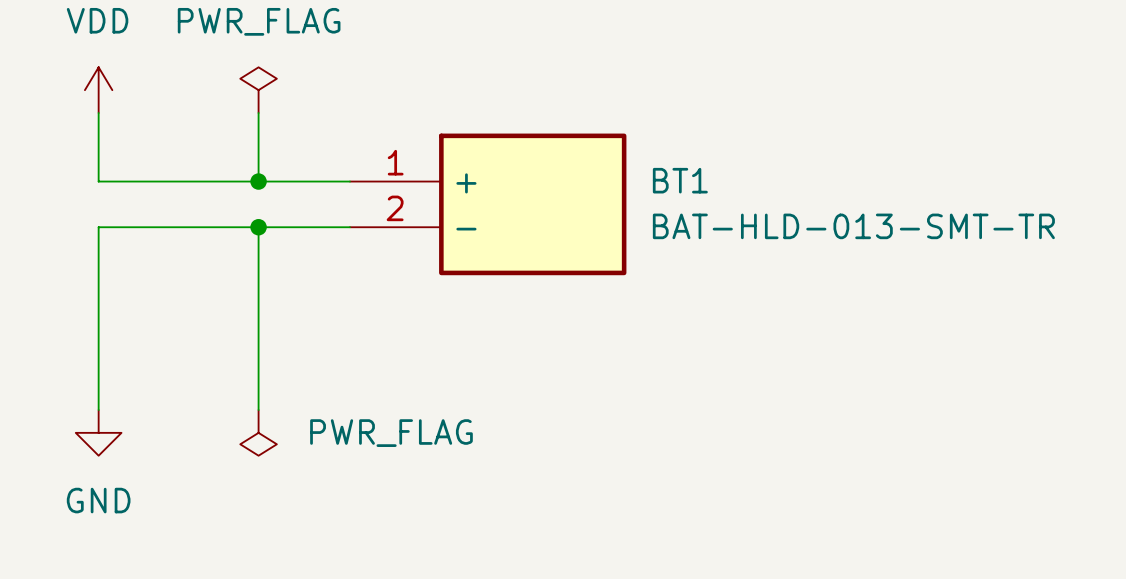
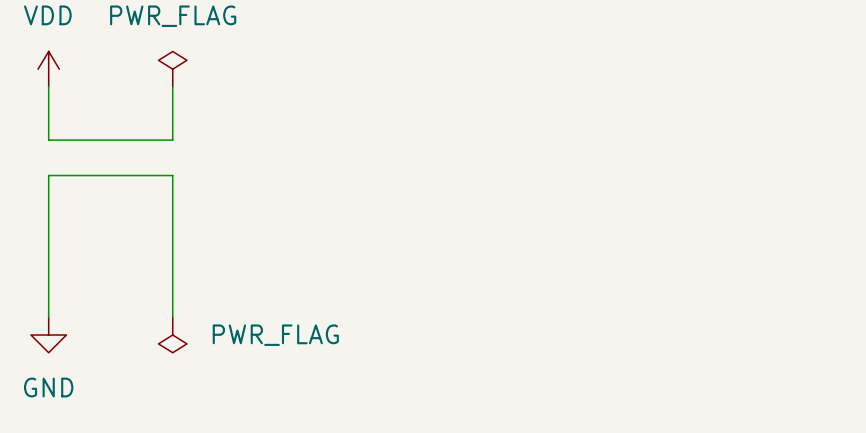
wire: (258, 181) (349, 181) -> none
junction: (258, 181) -> none
BT1: BAT-HLD-013-SMT-TR (488, 204) -> none
wire: (258, 227) (349, 227) -> none
junction: (258, 227) -> none

